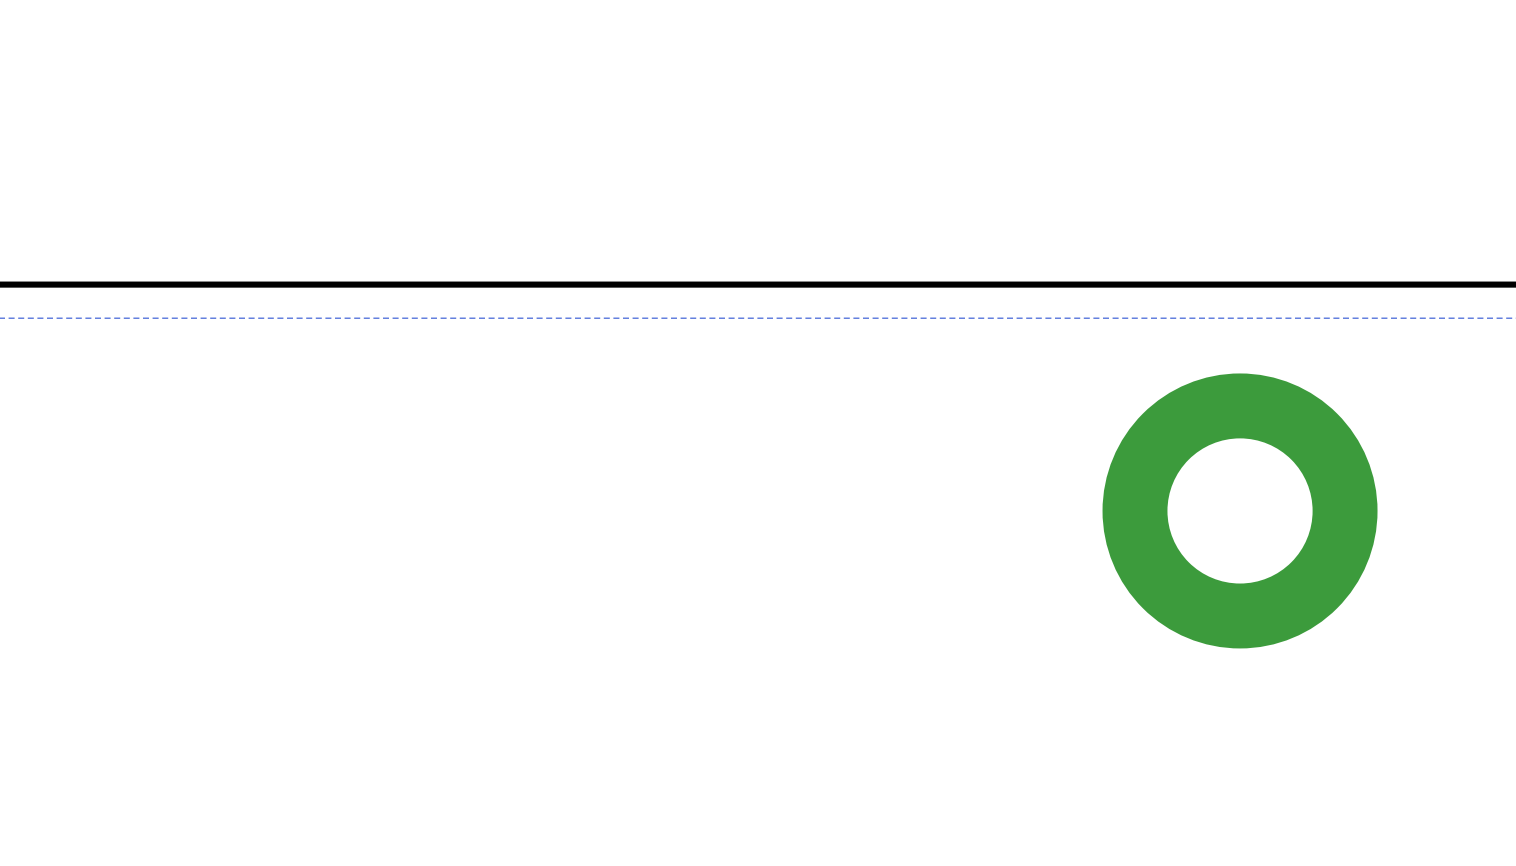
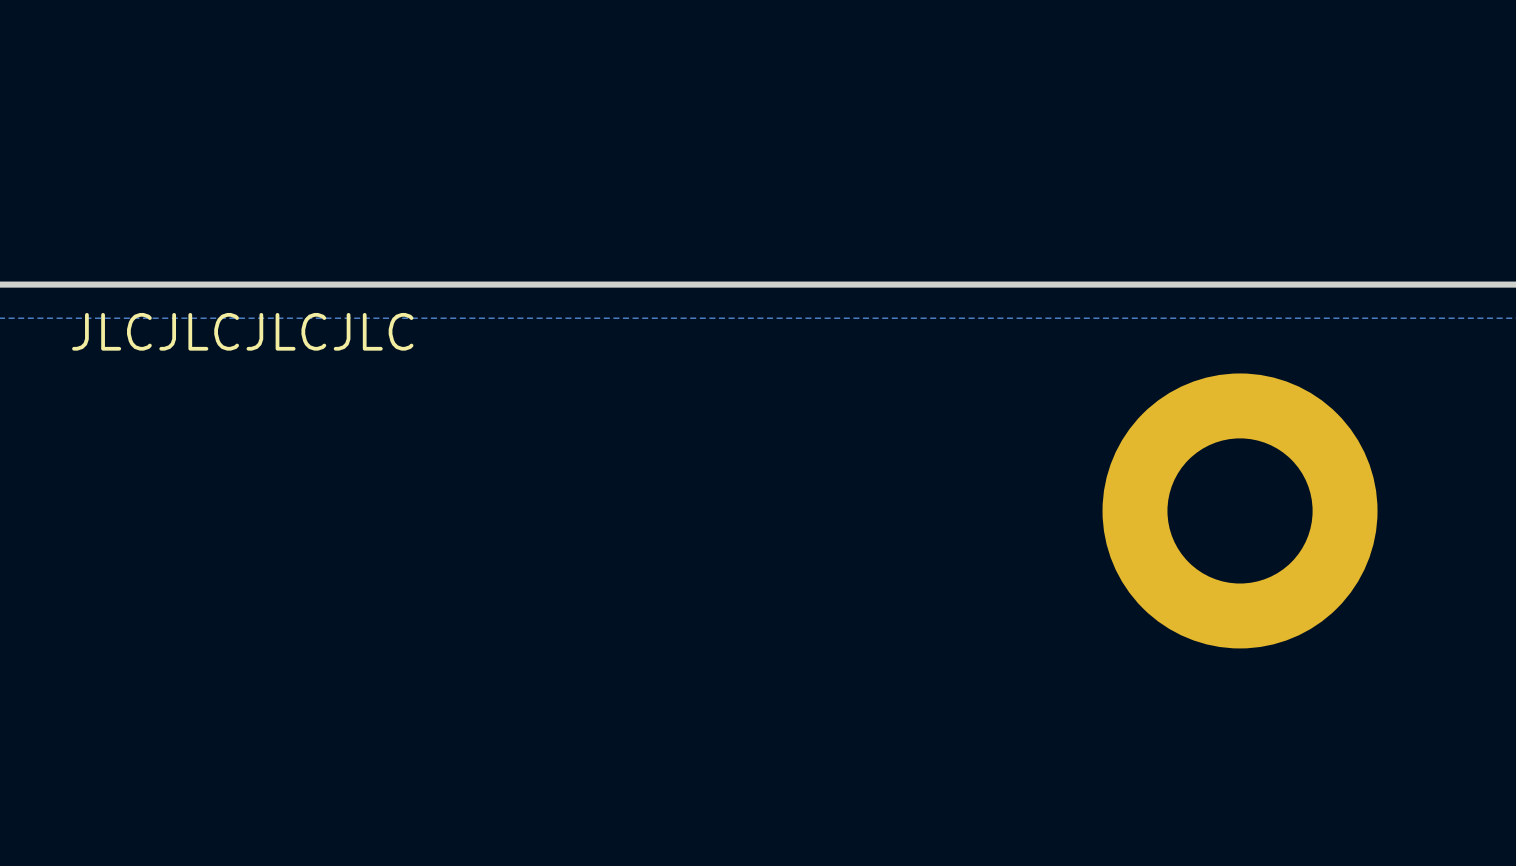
text: none -> JLCJLCJLCJLC (242, 331)

